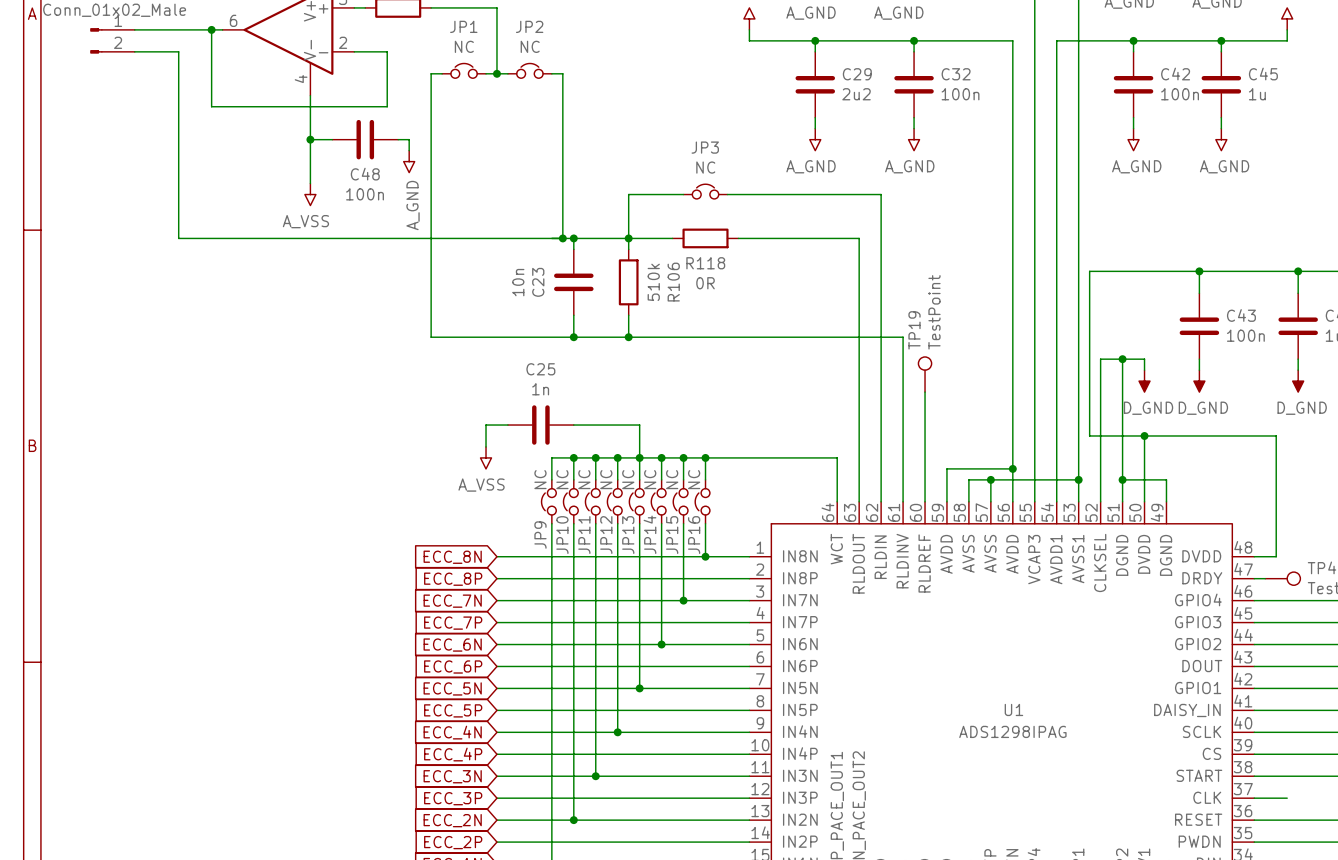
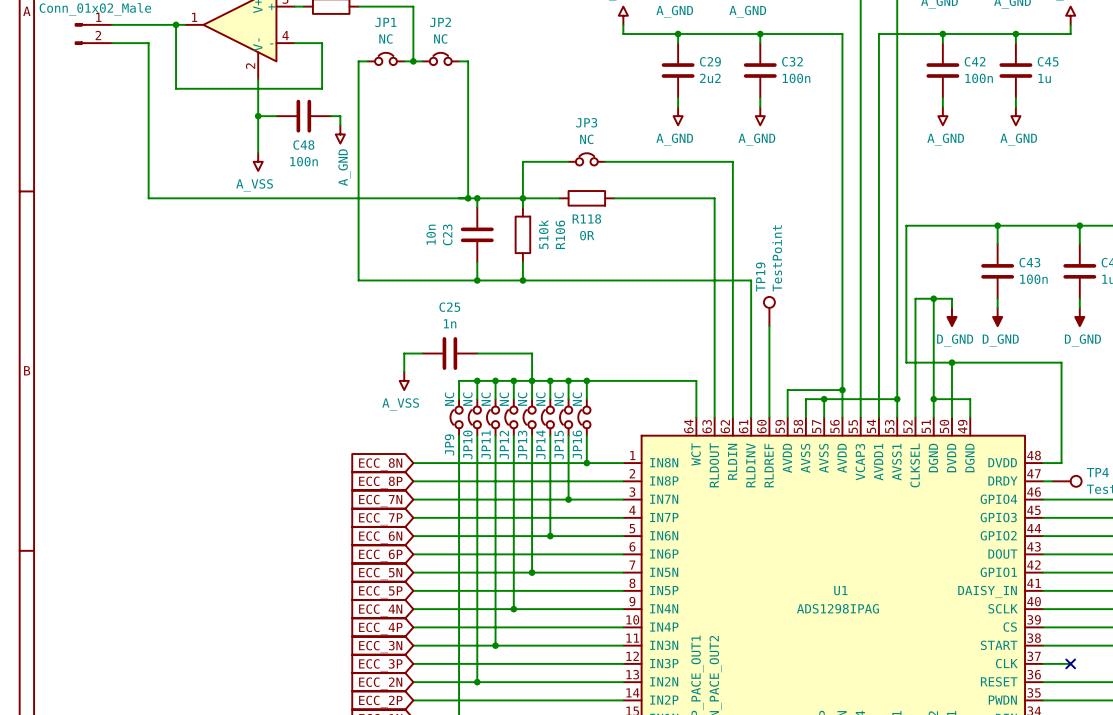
part pin number: 6 (233, 20) -> 1 (194, 17)
part pin number: 2 (343, 42) -> 4 (285, 35)
part pin number: 4 (301, 79) -> 2 (250, 66)
no-connect mark: none -> (1070, 663)

